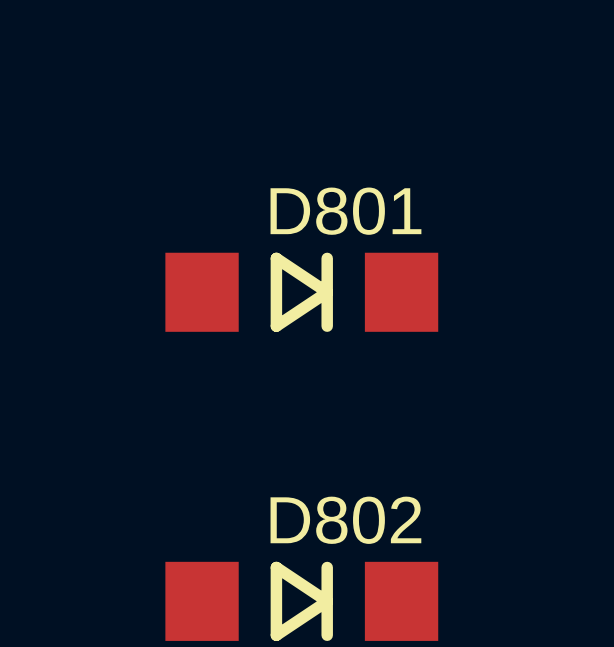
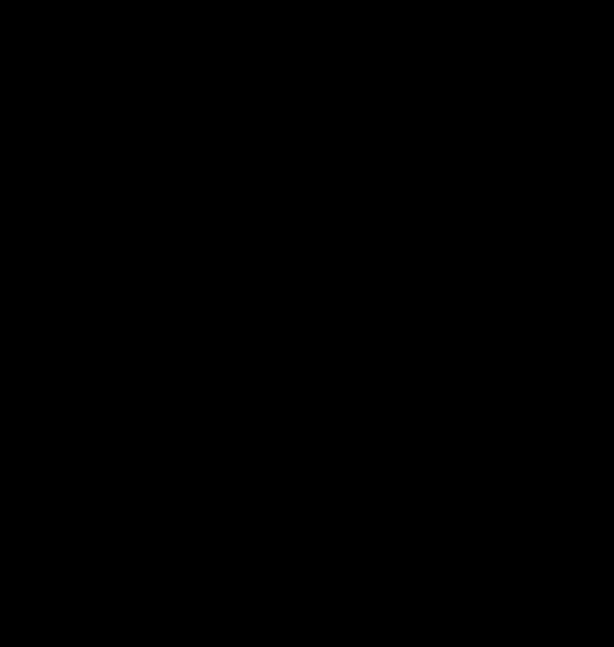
D801: (301, 292) -> none
D802: (301, 601) -> none

